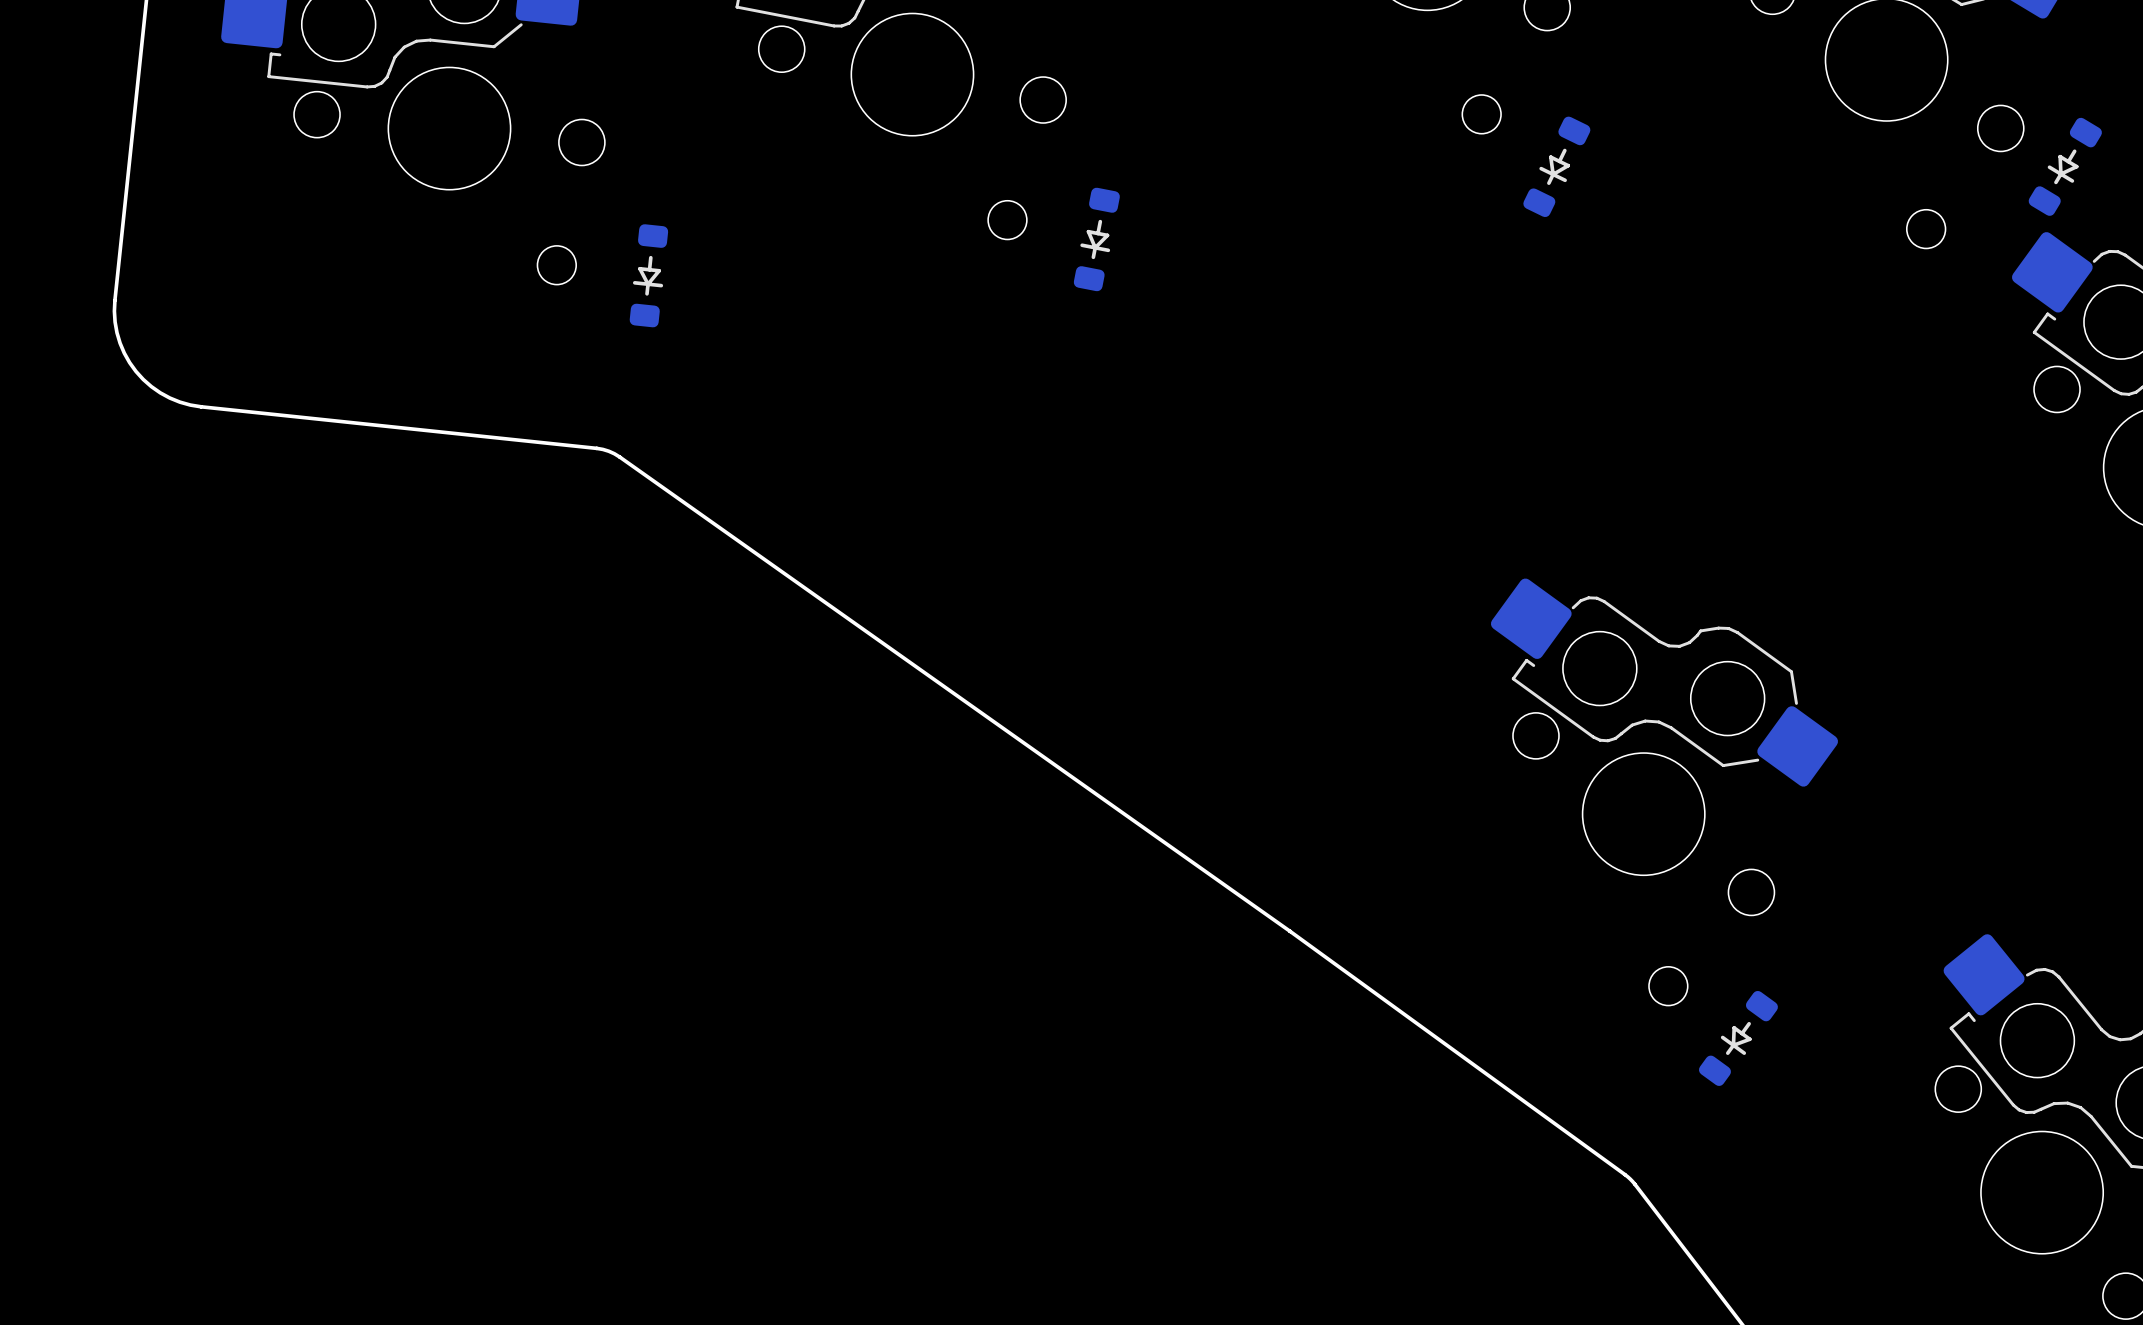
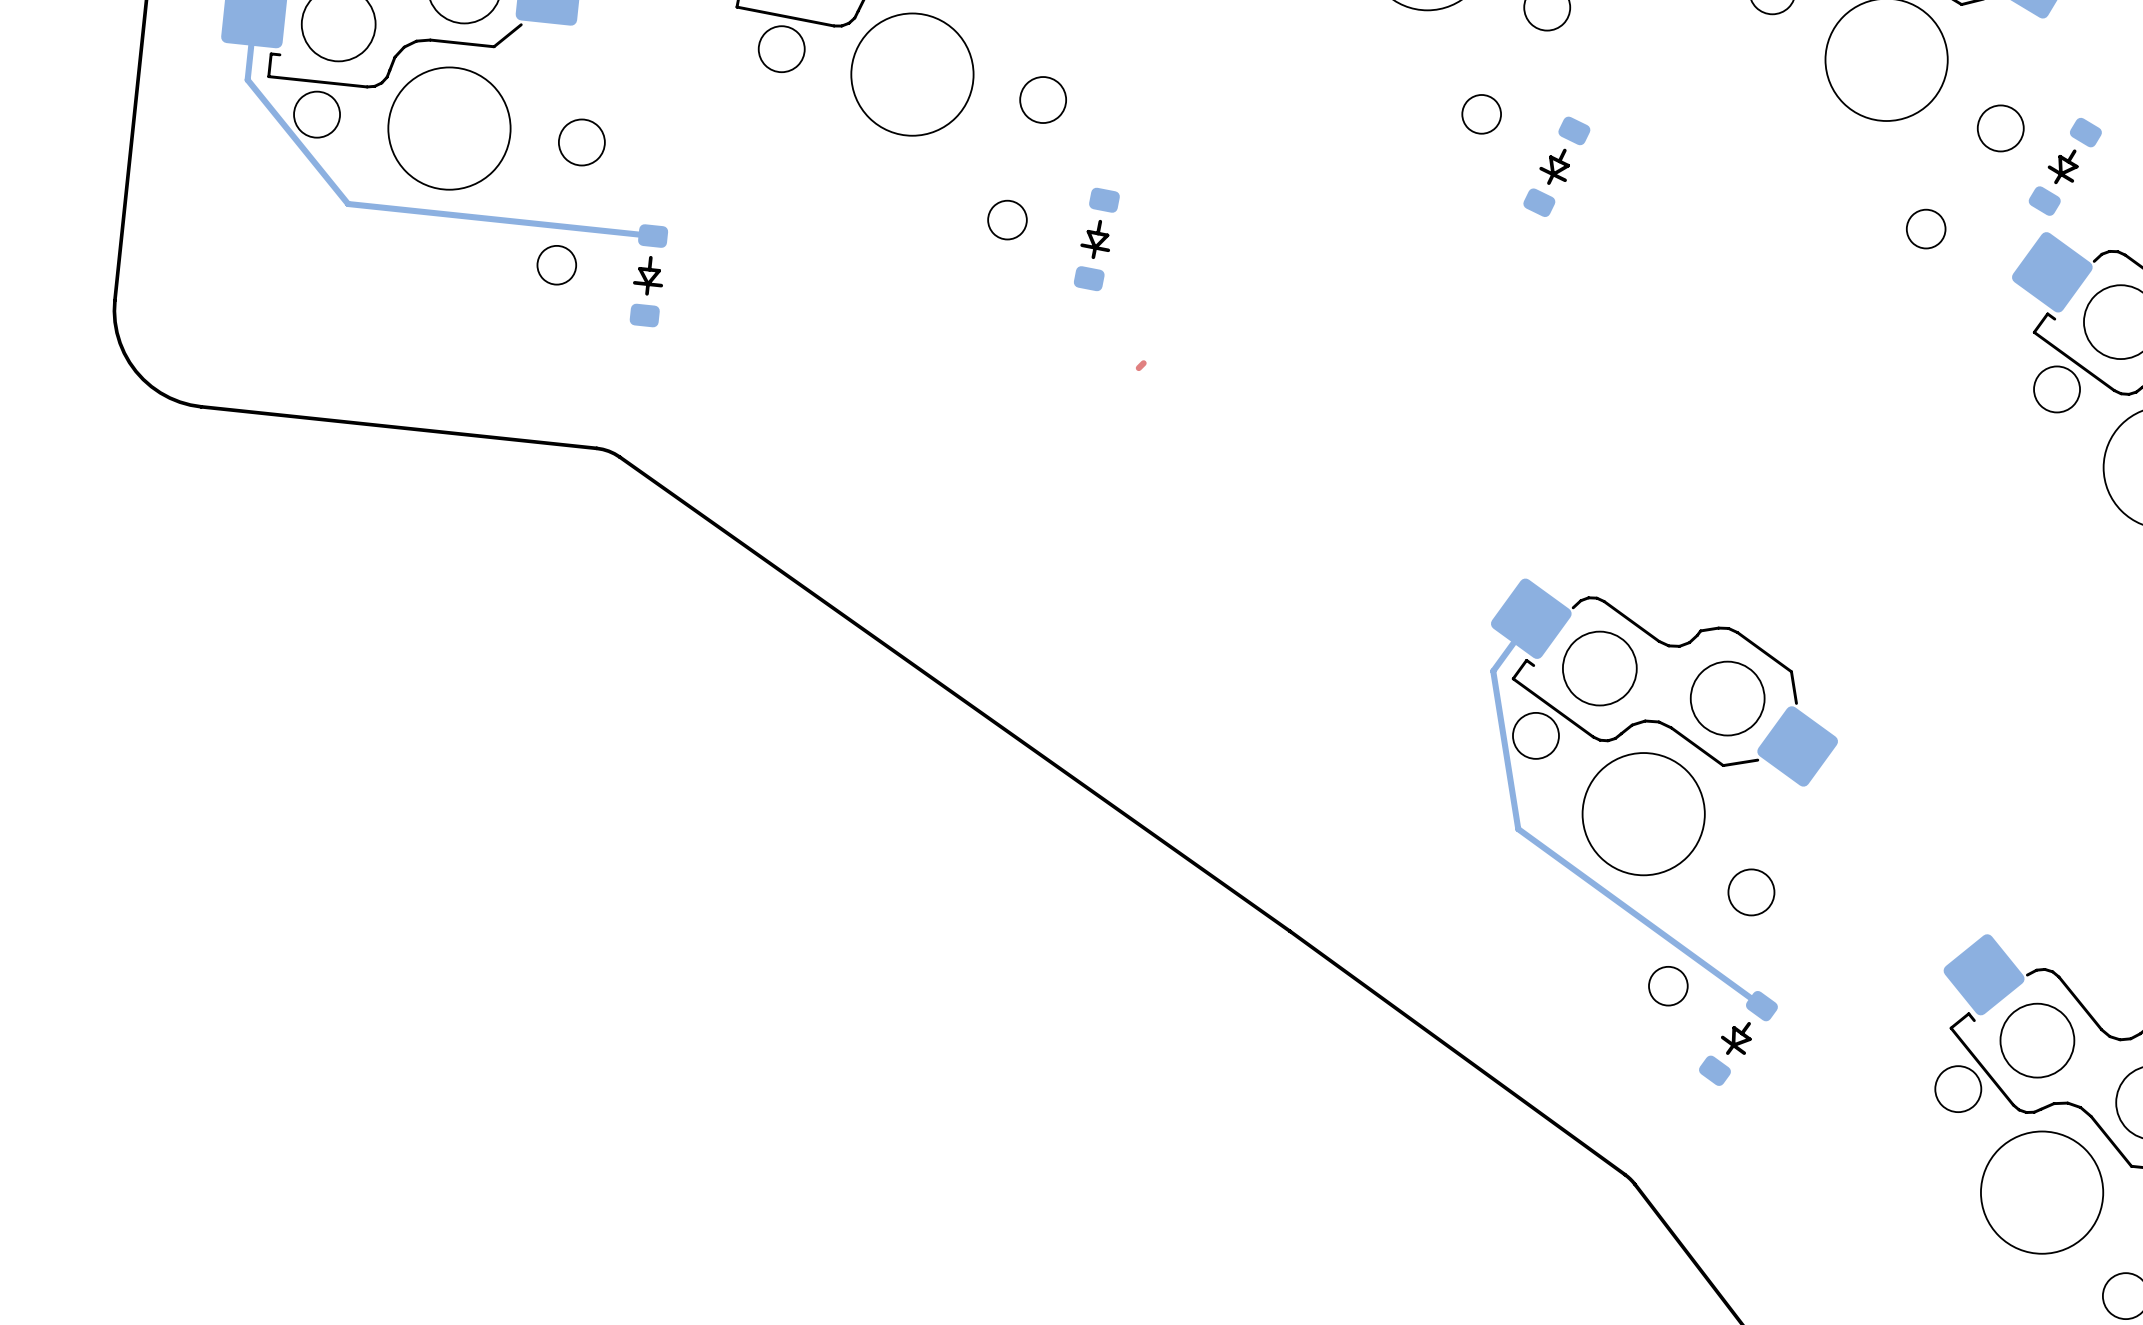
bottom track: none -> (254, 15) (247, 79) (348, 204) (653, 236)
top track: none -> (1143, 363) (1138, 368)
bottom track: none -> (1531, 618) (1493, 671) (1518, 829) (1761, 1006)

